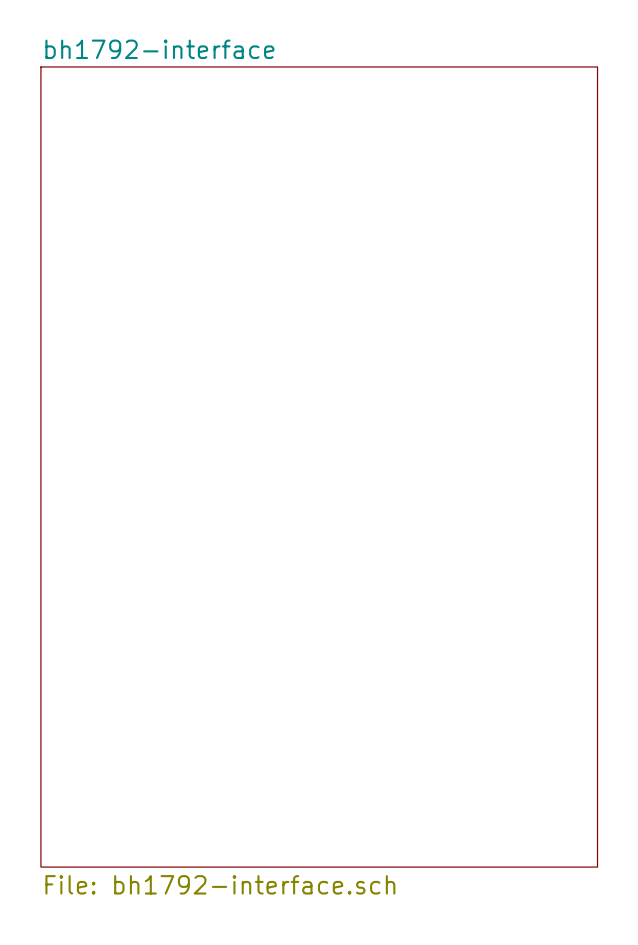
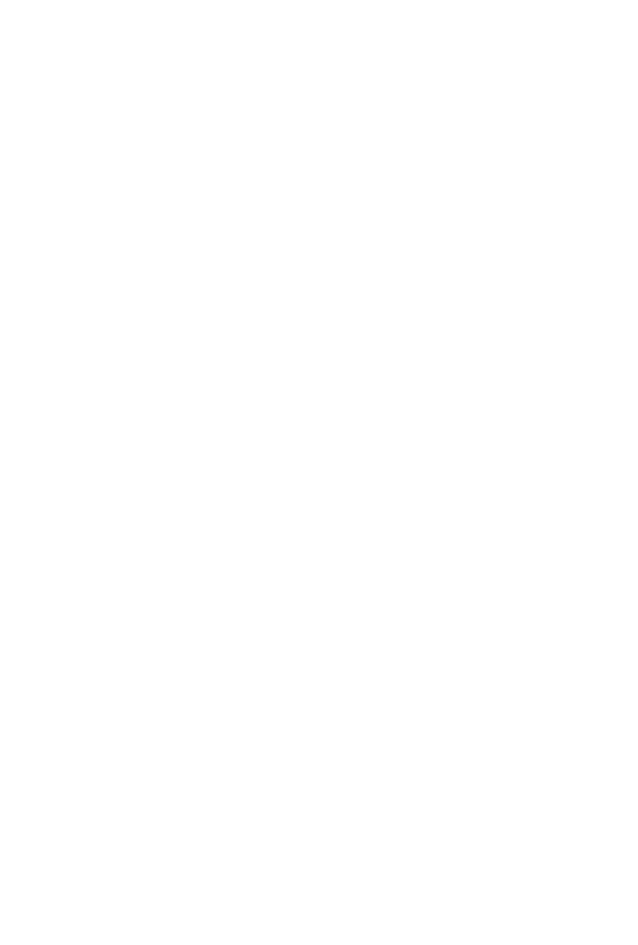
sheet bh1792-interface: File: bh1792-interface.sch (319, 467) -> none

